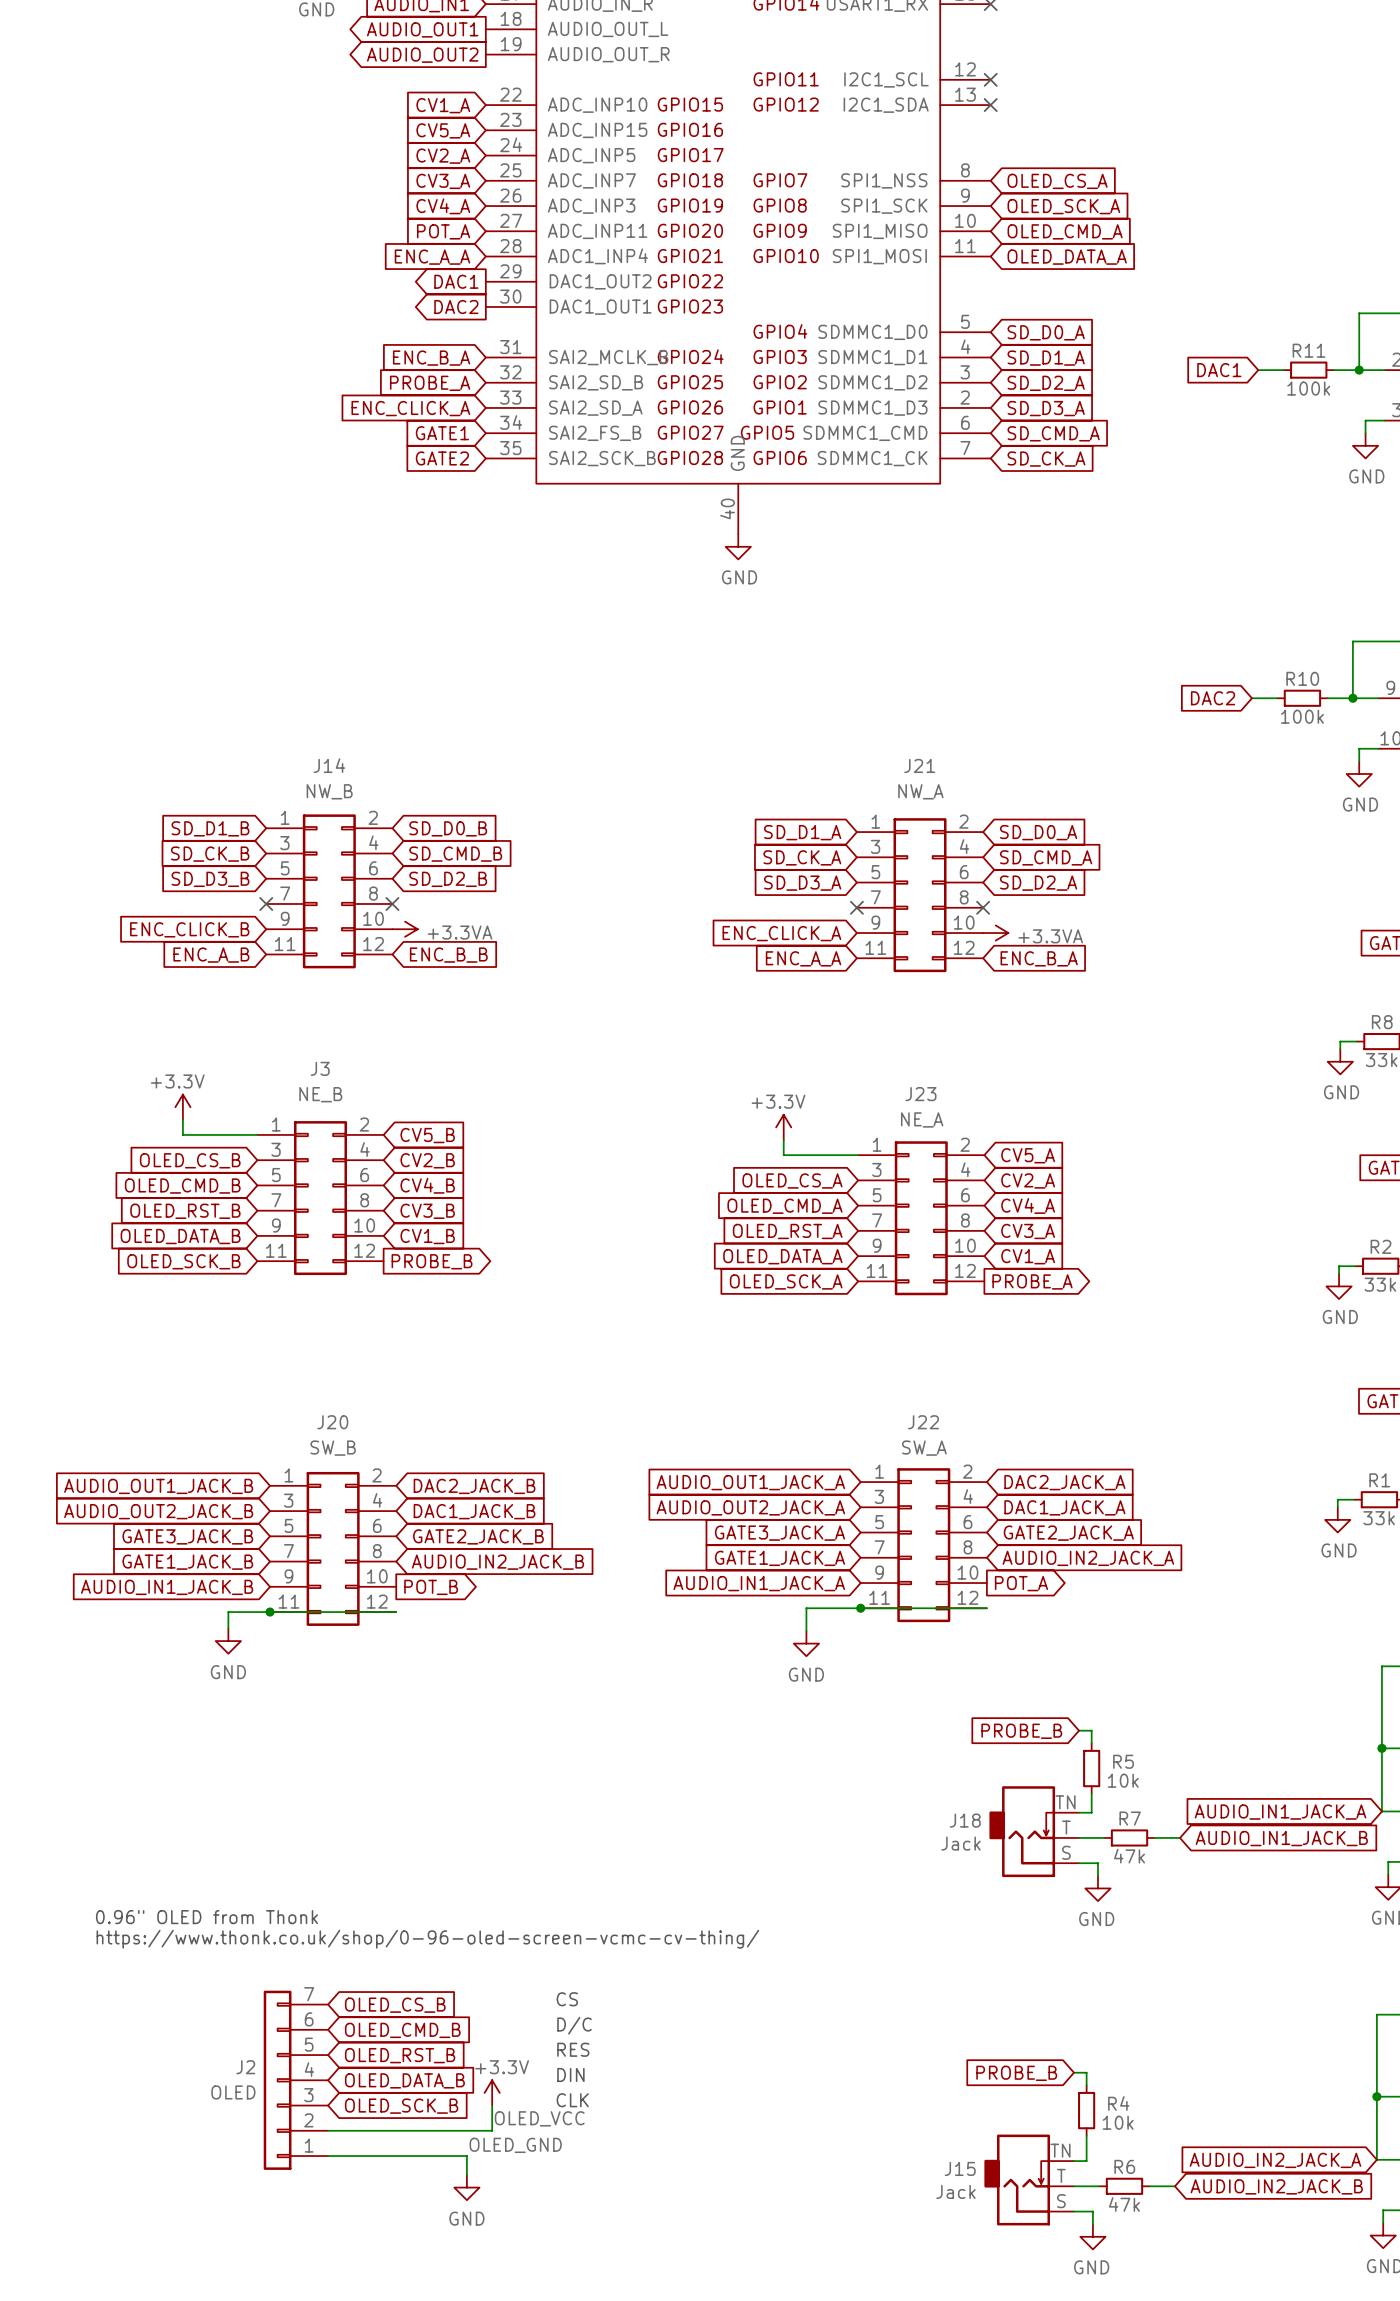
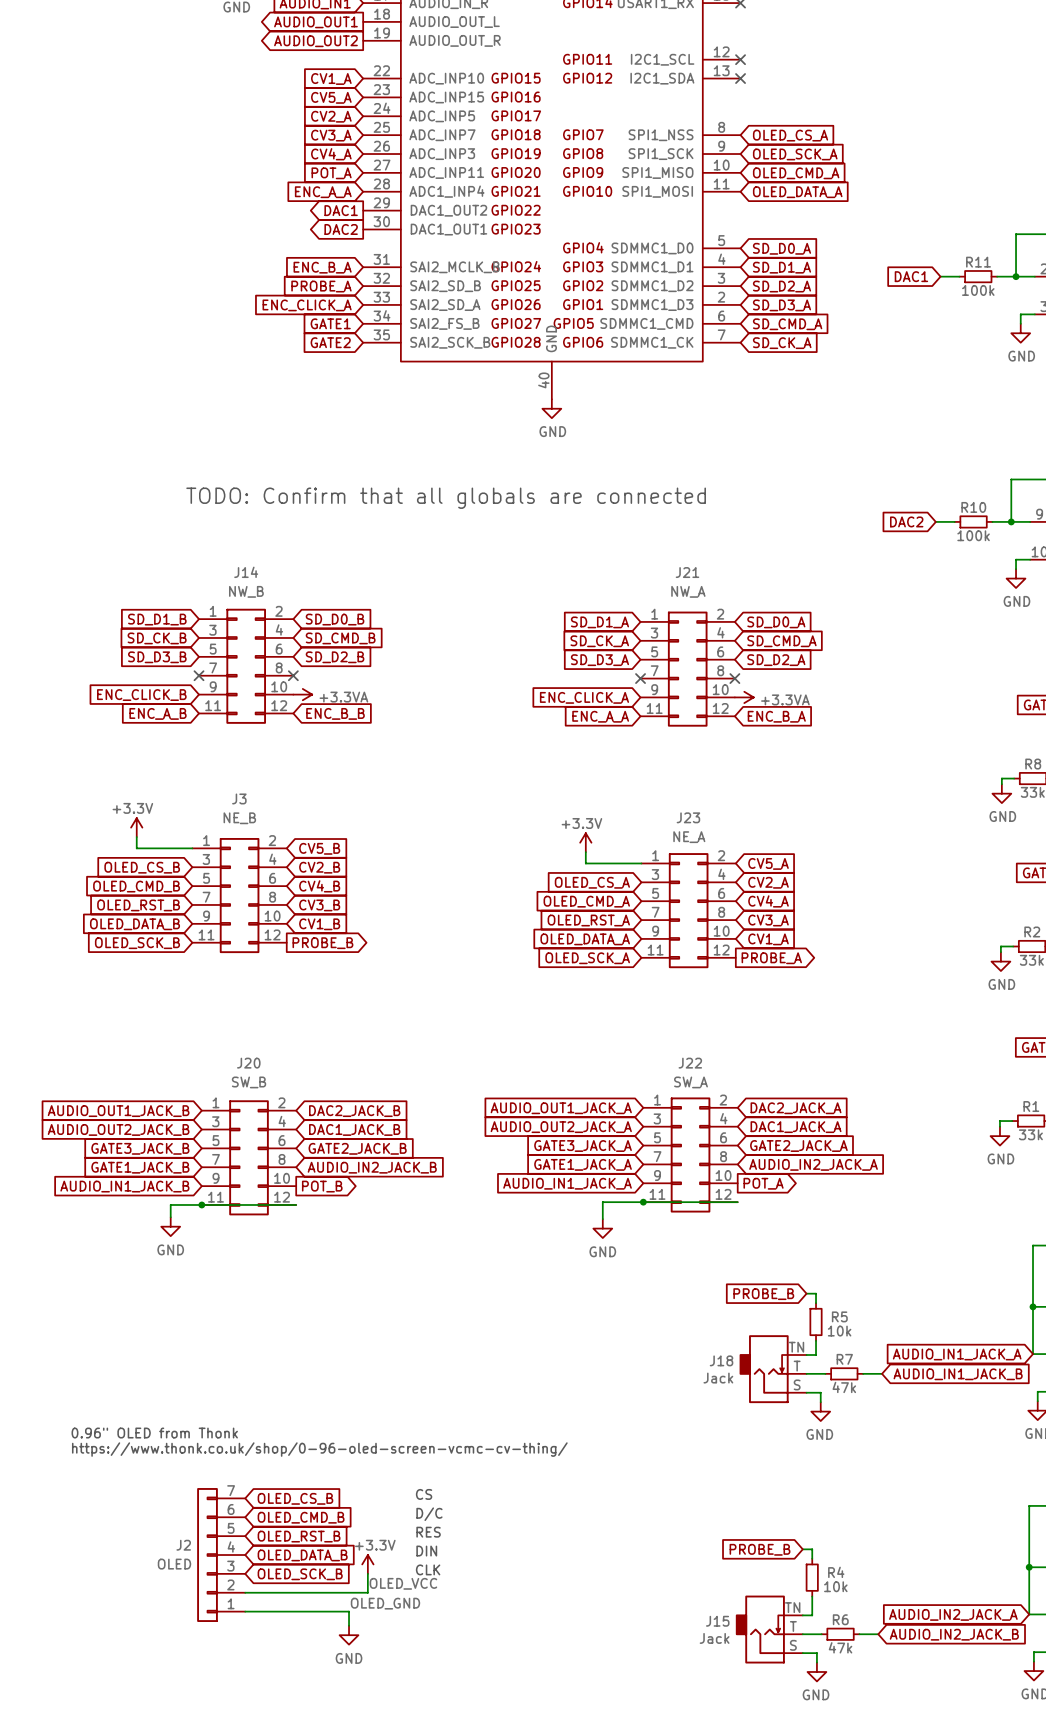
text: none -> TODO: Confirm that all globals are connected (446, 498)

